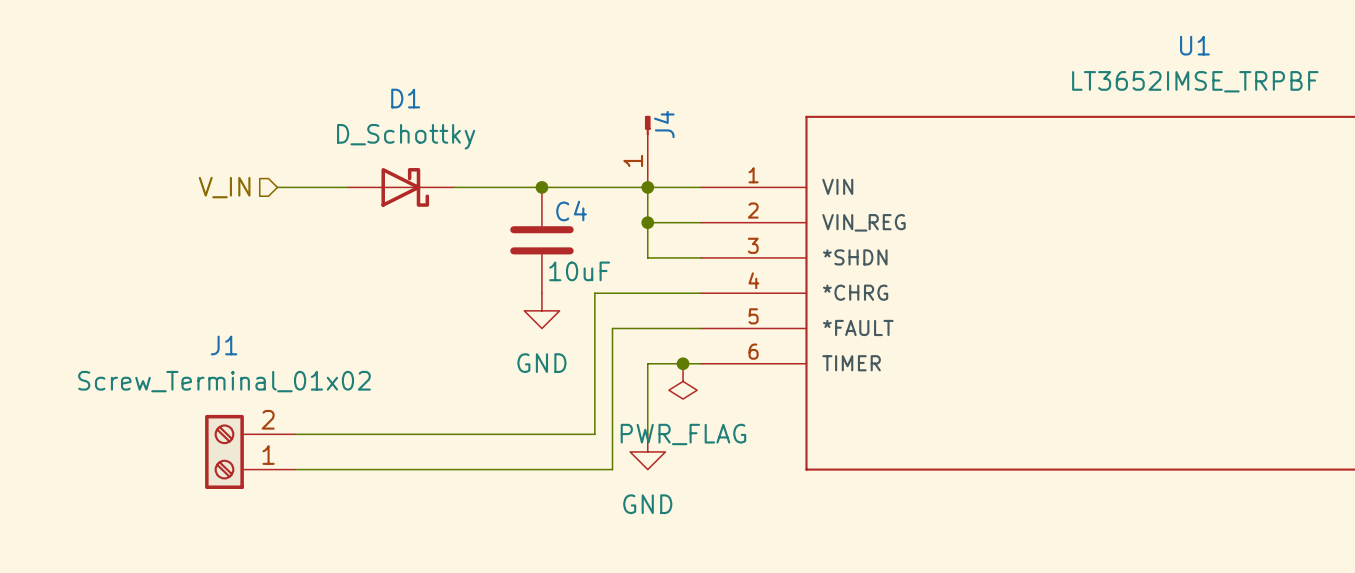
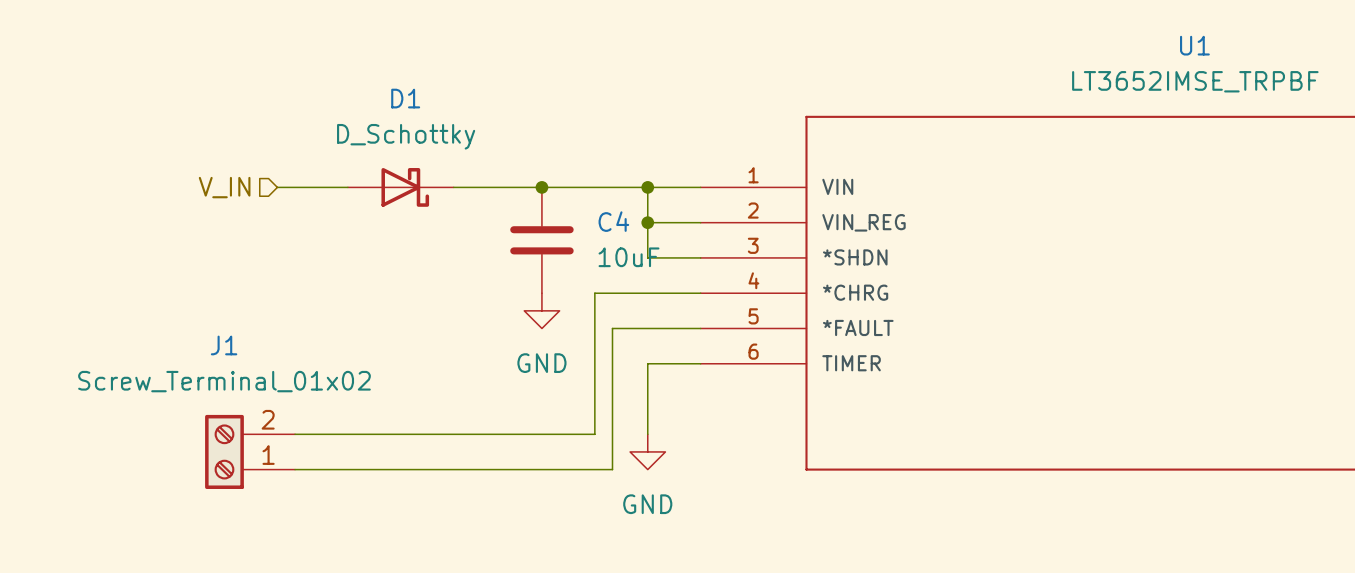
J4: (647, 151) -> none
C4 name position: C4 (571, 211) -> C4 (613, 221)
C4 value position: 10uF (579, 271) -> 10uF (629, 257)
junction: (683, 363) -> none
power symbol: PWR_FLAG (683, 381) -> none

